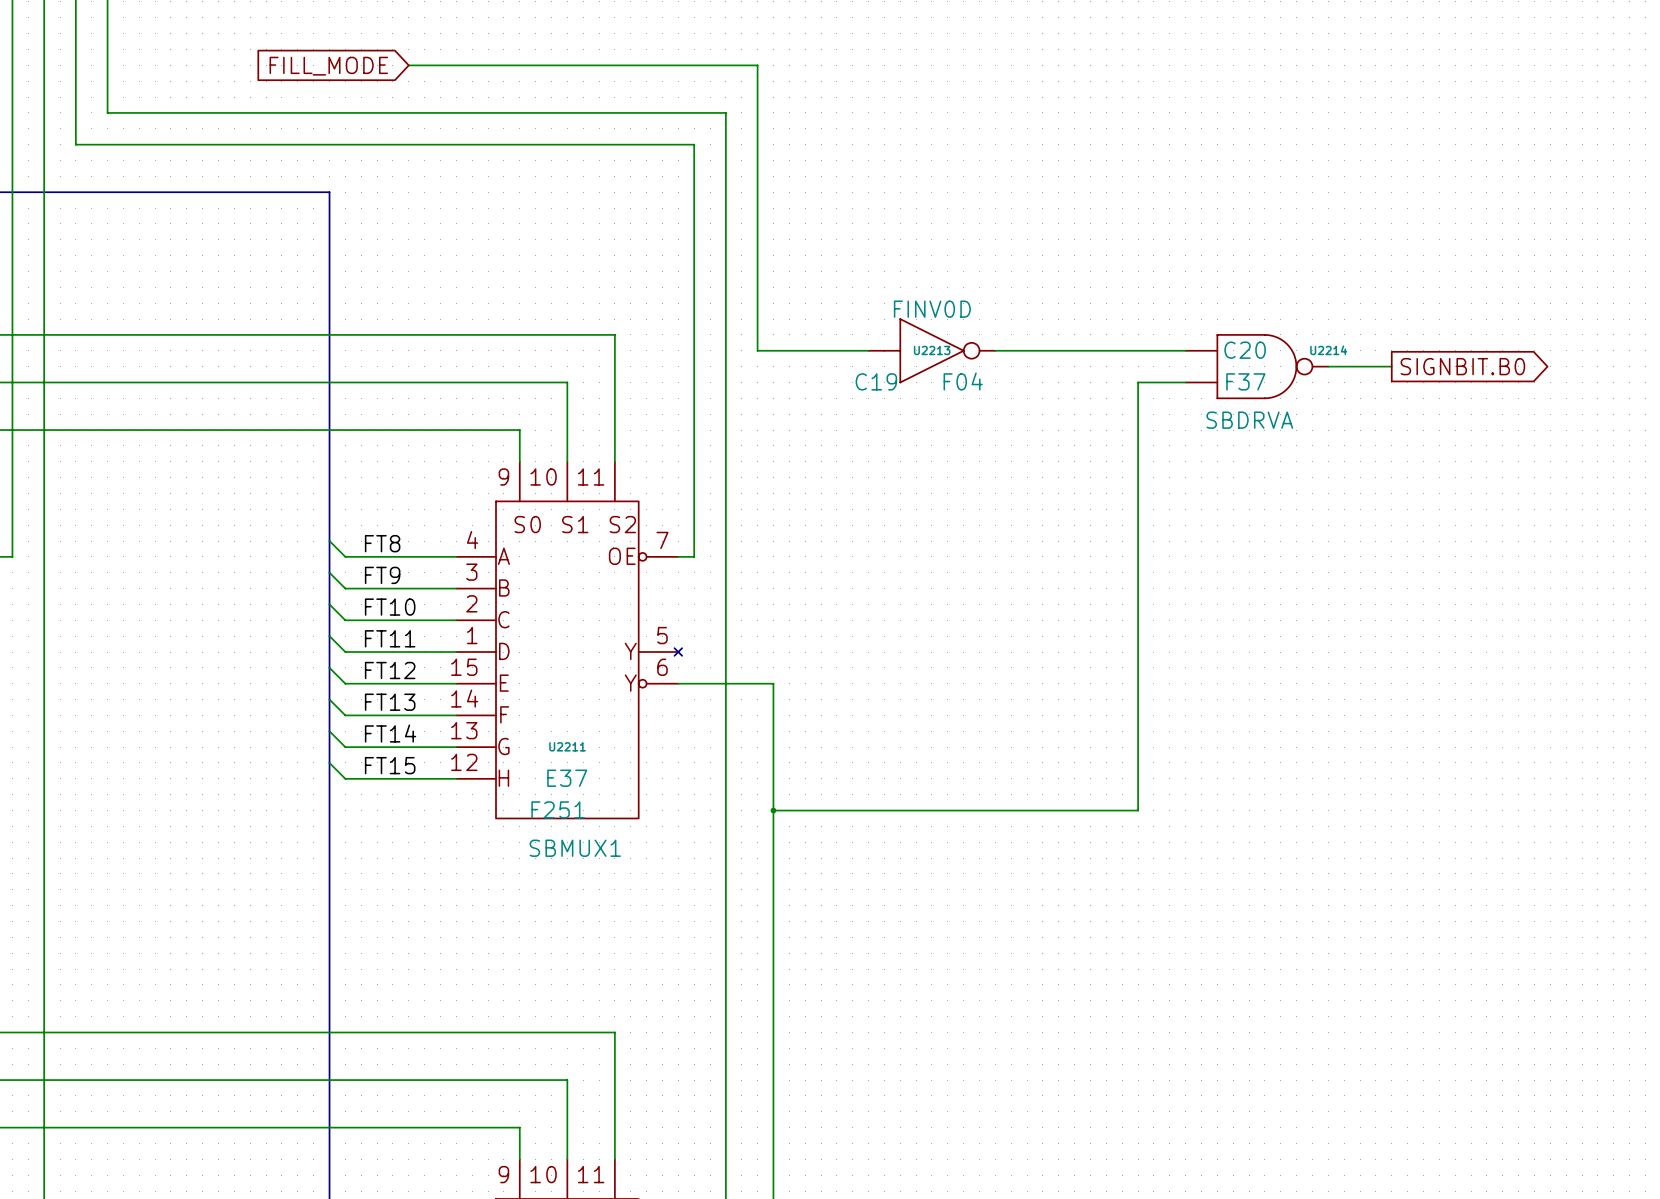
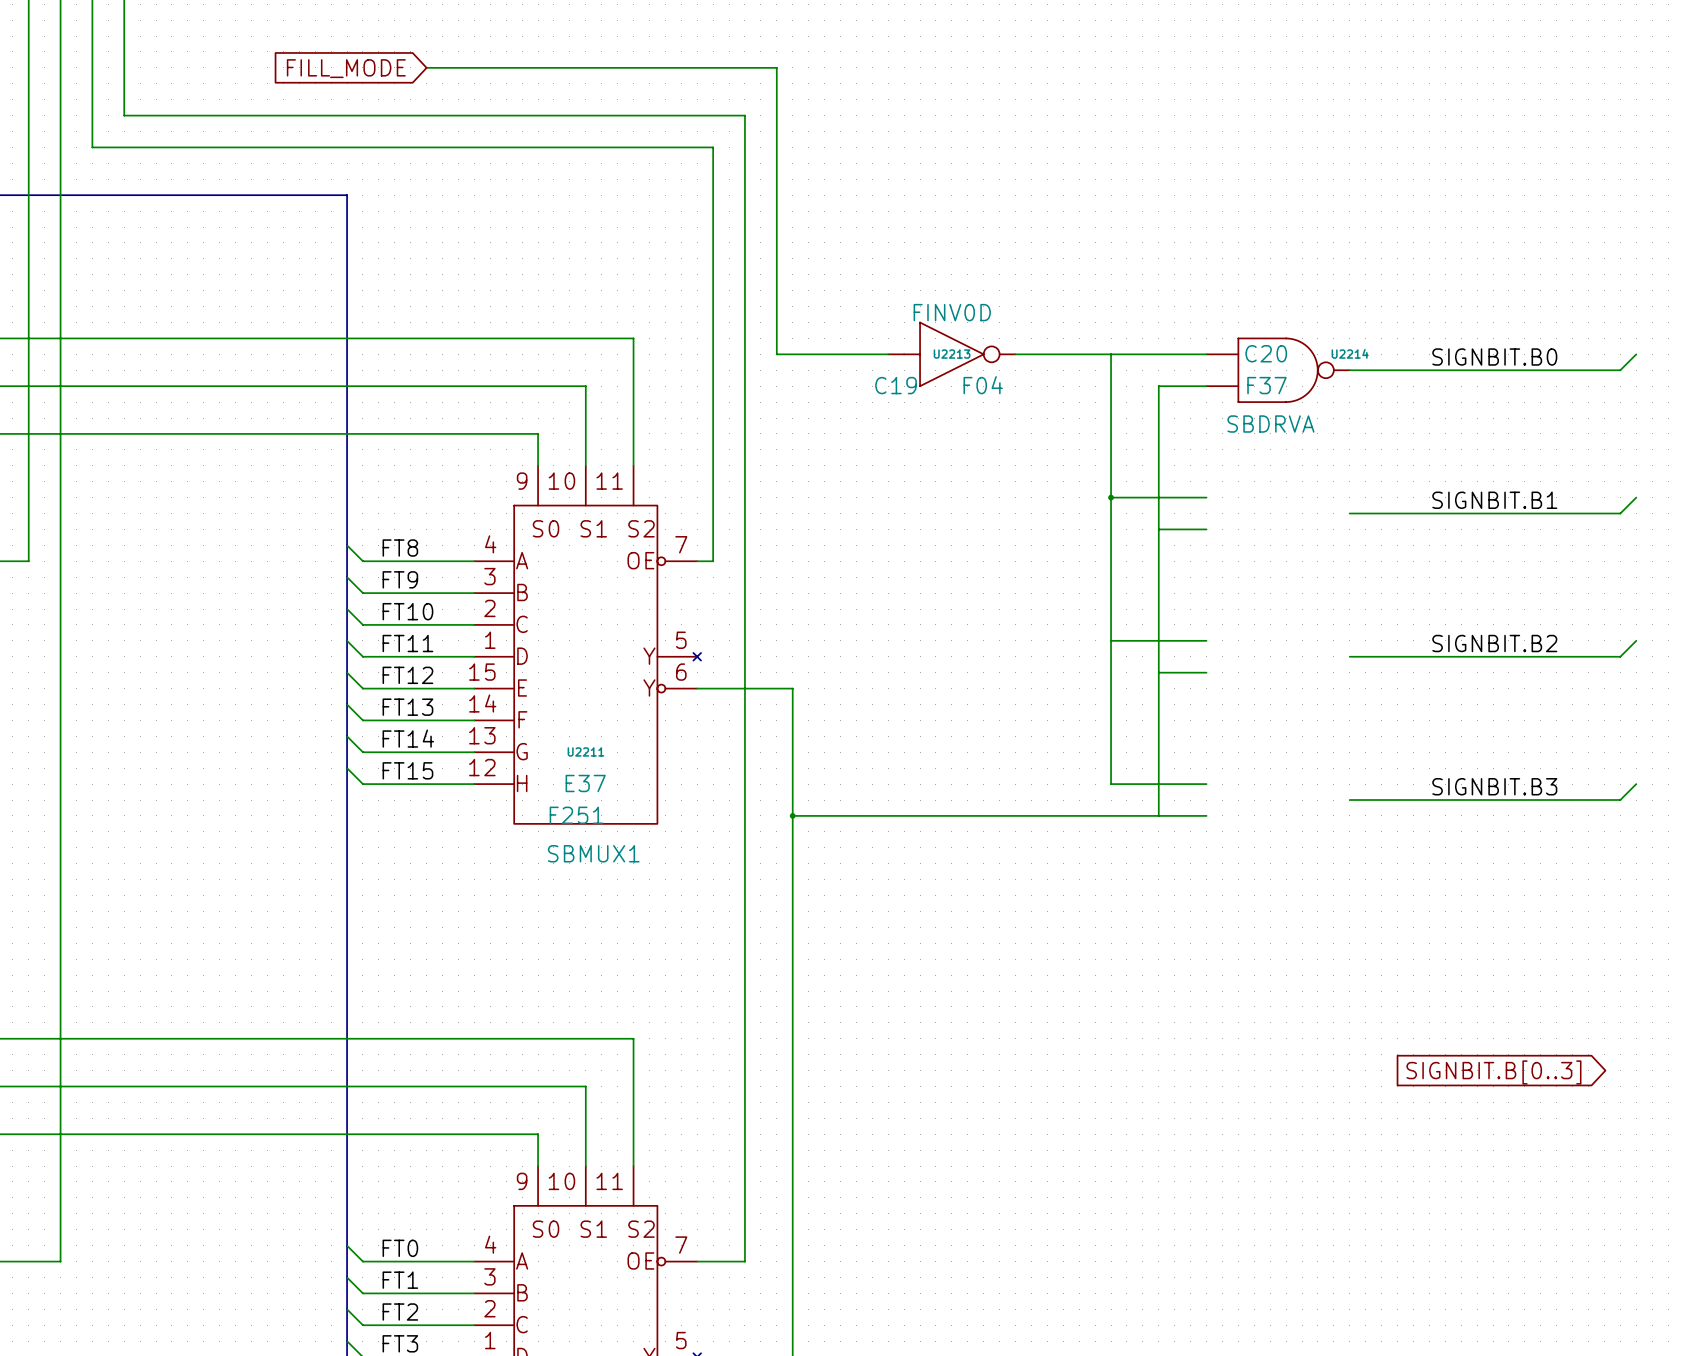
wire: none -> (1111, 354) (1111, 784) (1206, 784)
wire: none -> (1636, 354) (1620, 370) (1413, 370)
label: none -> SIGNBIT.B0 (1494, 357)
global label: SIGNBIT.B0 (1462, 366) -> none
wire: none -> (1111, 497) (1206, 497)
junction: none -> (1111, 497)
wire: none -> (1636, 497) (1620, 513) (1349, 513)
label: none -> SIGNBIT.B1 (1494, 500)
wire: none -> (1158, 529) (1206, 529)
wire: none -> (1111, 640) (1206, 640)
wire: none -> (1636, 640) (1620, 656) (1349, 656)
label: none -> SIGNBIT.B2 (1494, 643)
wire: none -> (1158, 672) (1206, 672)
wire: none -> (1636, 784) (1620, 800) (1349, 800)
label: none -> SIGNBIT.B3 (1494, 786)
wire: none -> (1158, 815) (1206, 815)
global label: none -> SIGNBIT.B[0..3] (1493, 1072)

